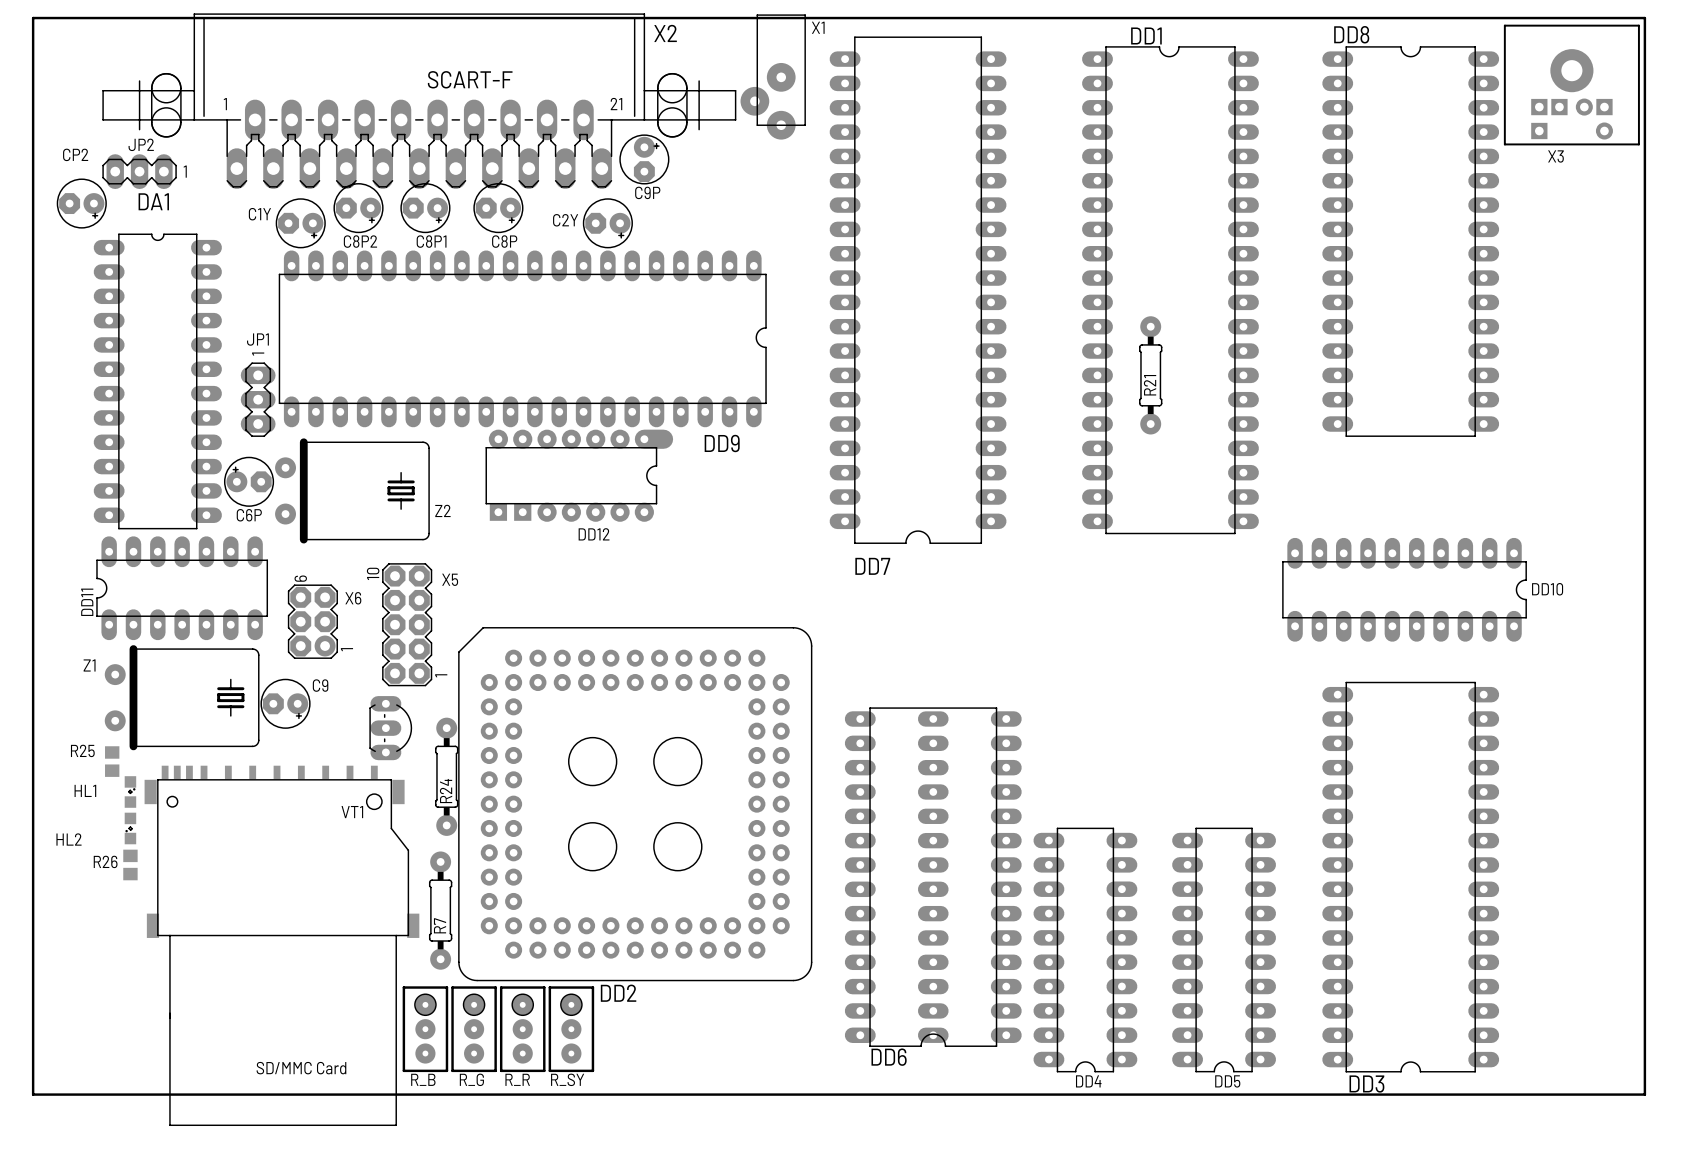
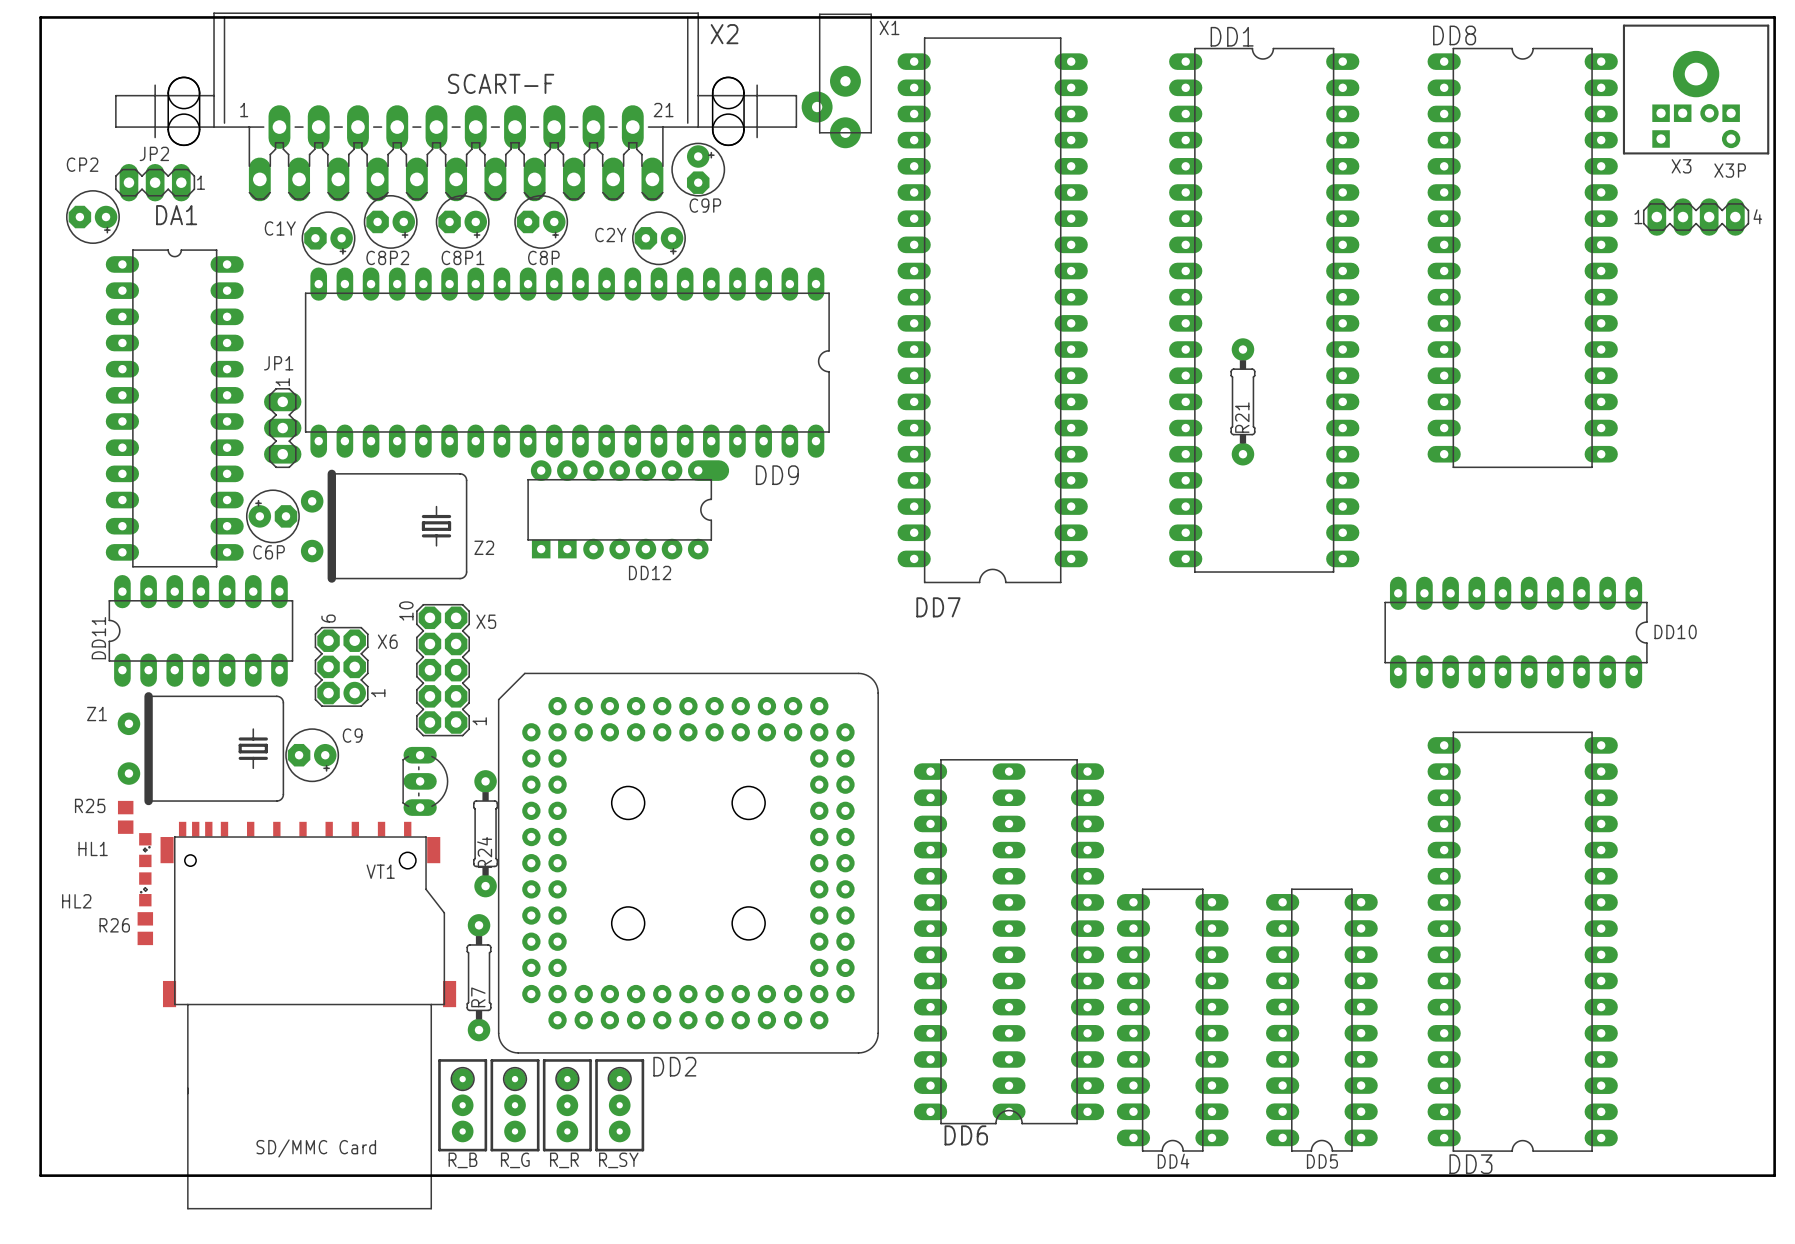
X3P: none -> (1696, 217)
DD2 footprint: [458, 627, 813, 982] -> [498, 672, 879, 1054]

